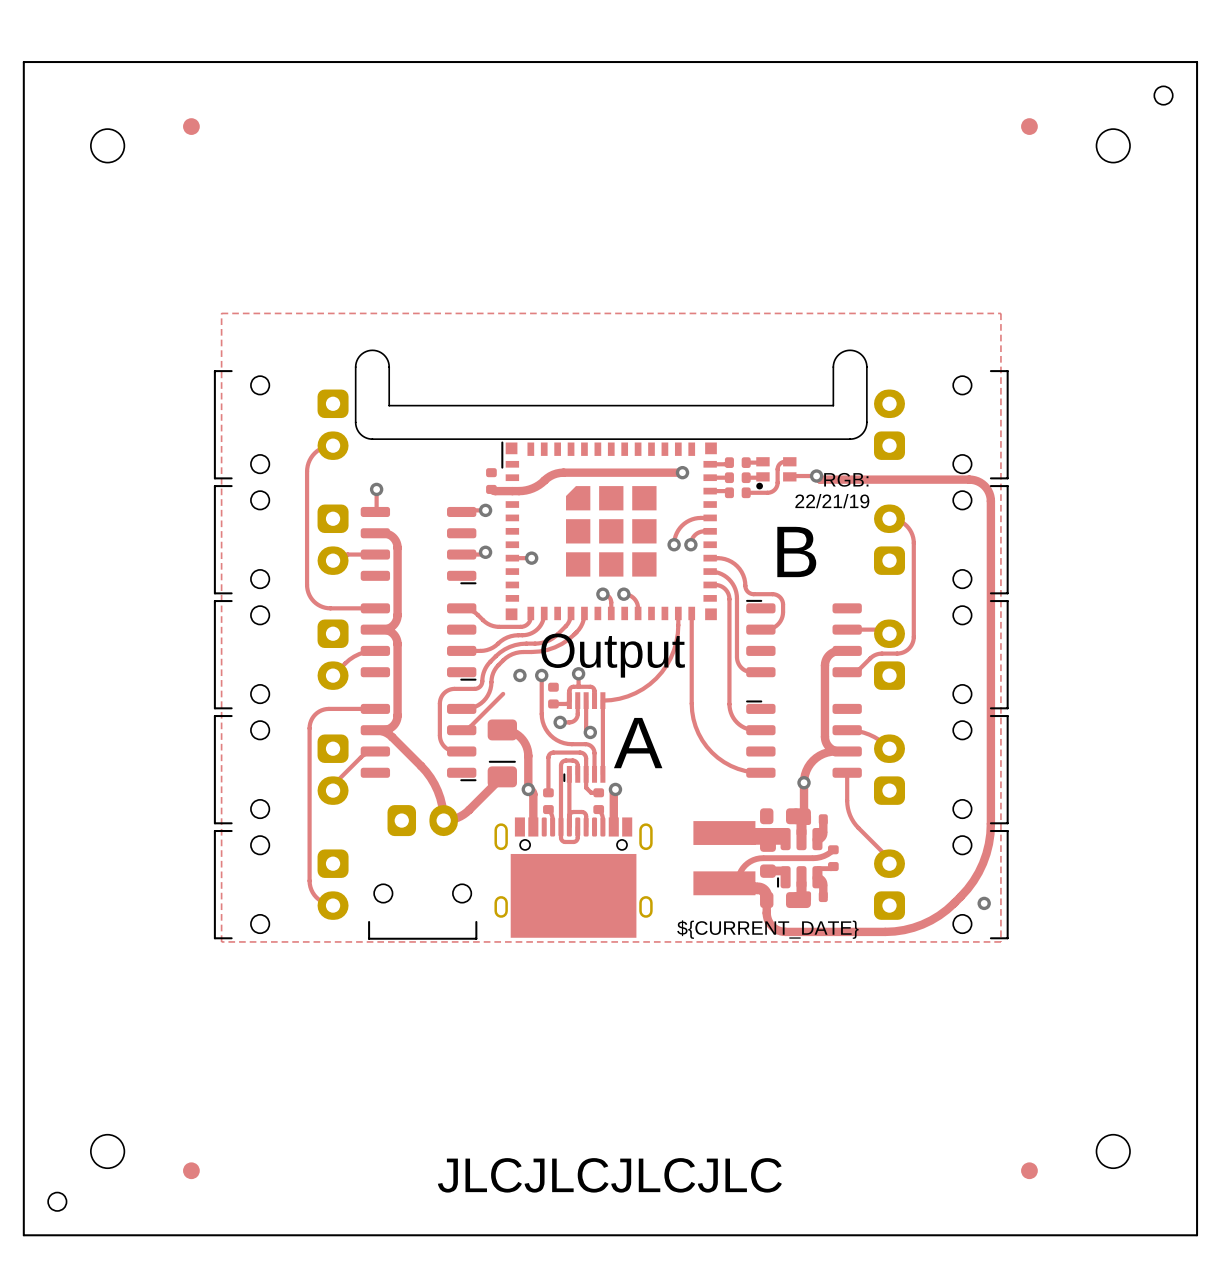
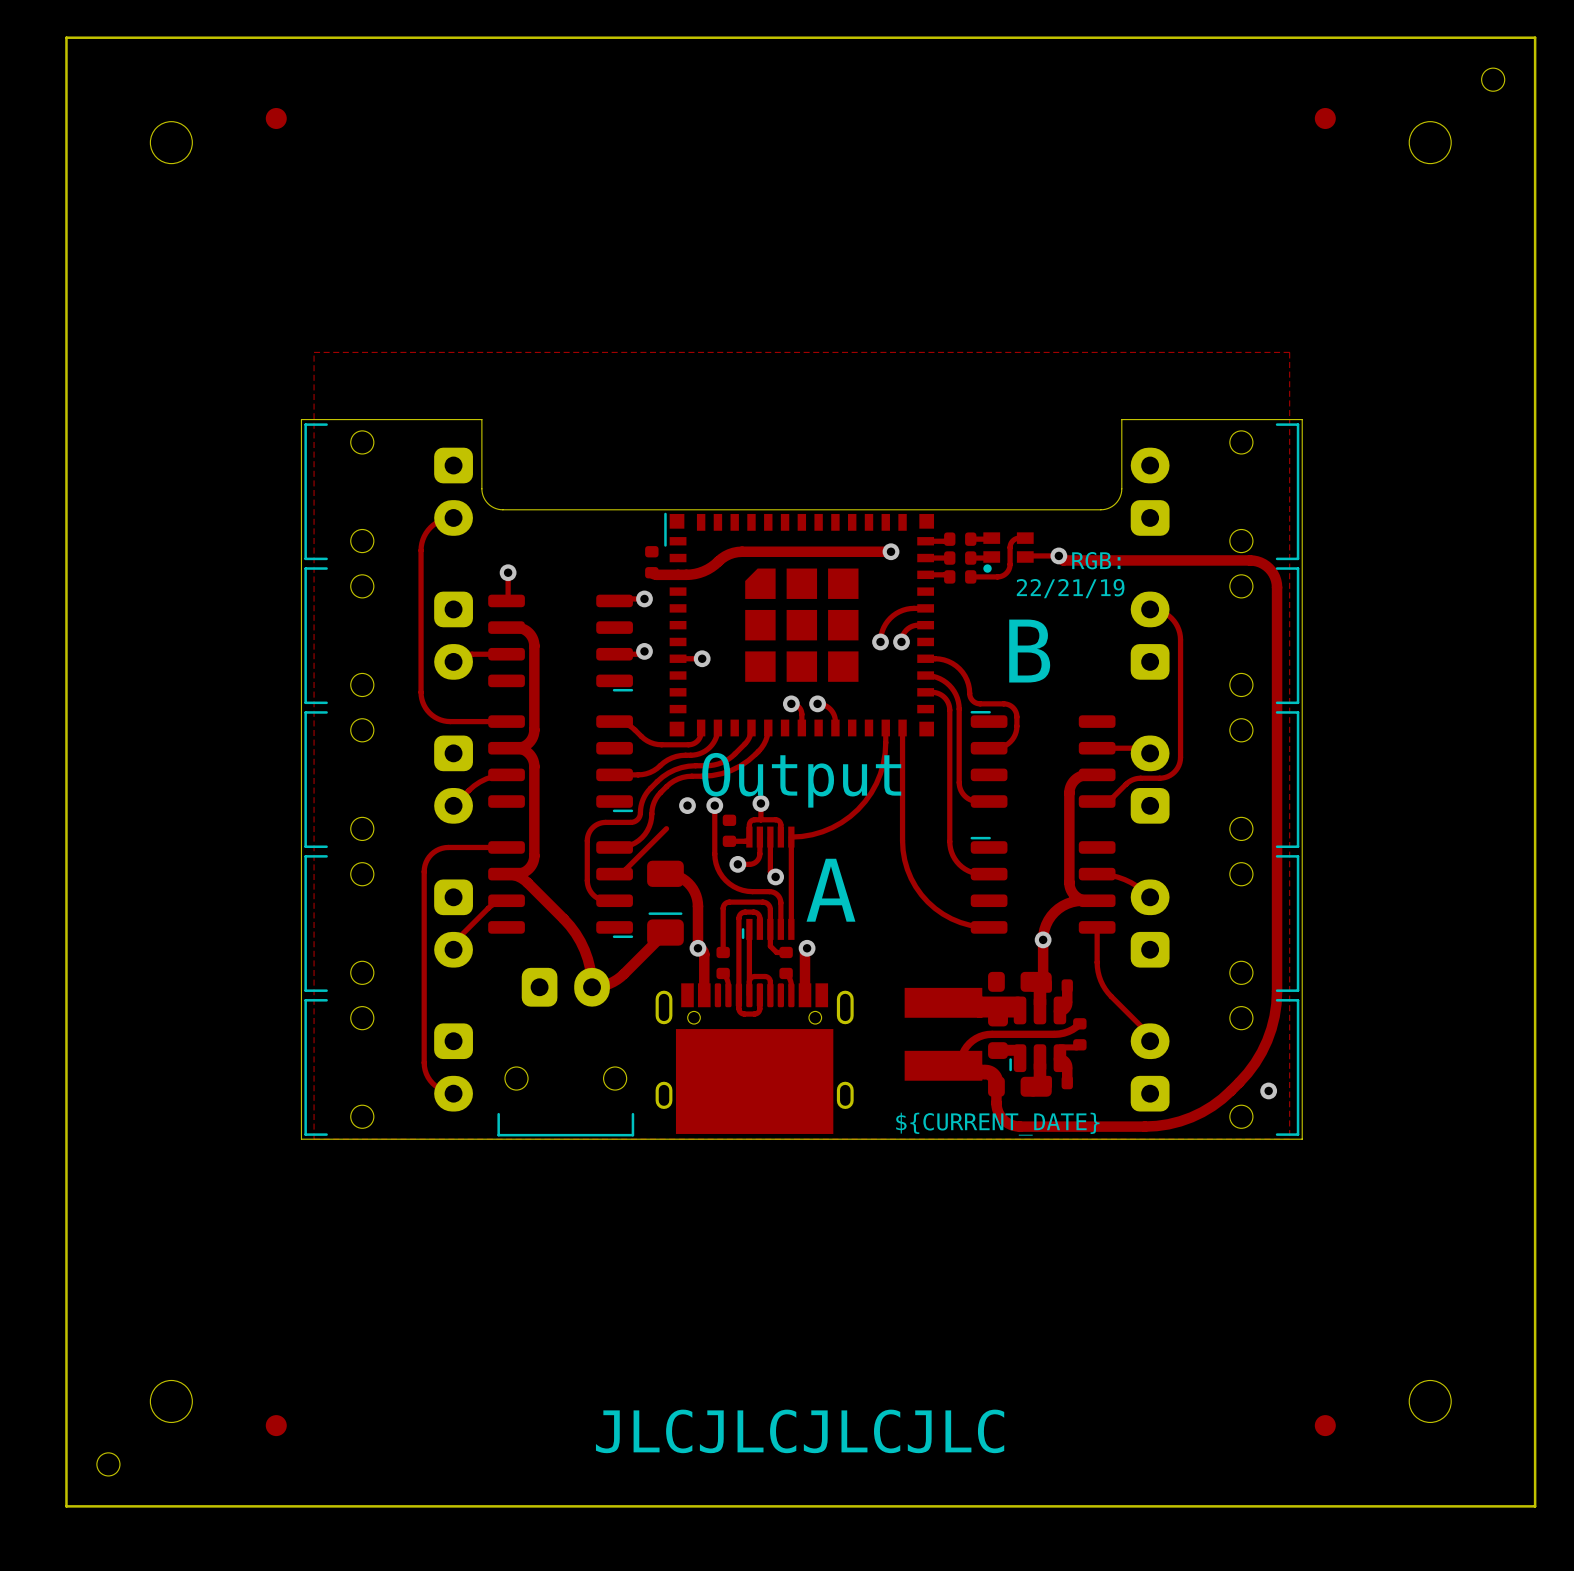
board edge: (355, 367) (359, 356) (366, 351) (376, 350) (385, 356) (389, 364) (389, 405) (833, 405) (833, 365) (837, 355) (846, 350) (856, 351) (863, 357) (866, 367) -> (481, 419) (301, 419) (301, 1139) (1302, 1139) (1302, 419) (1121, 419)

